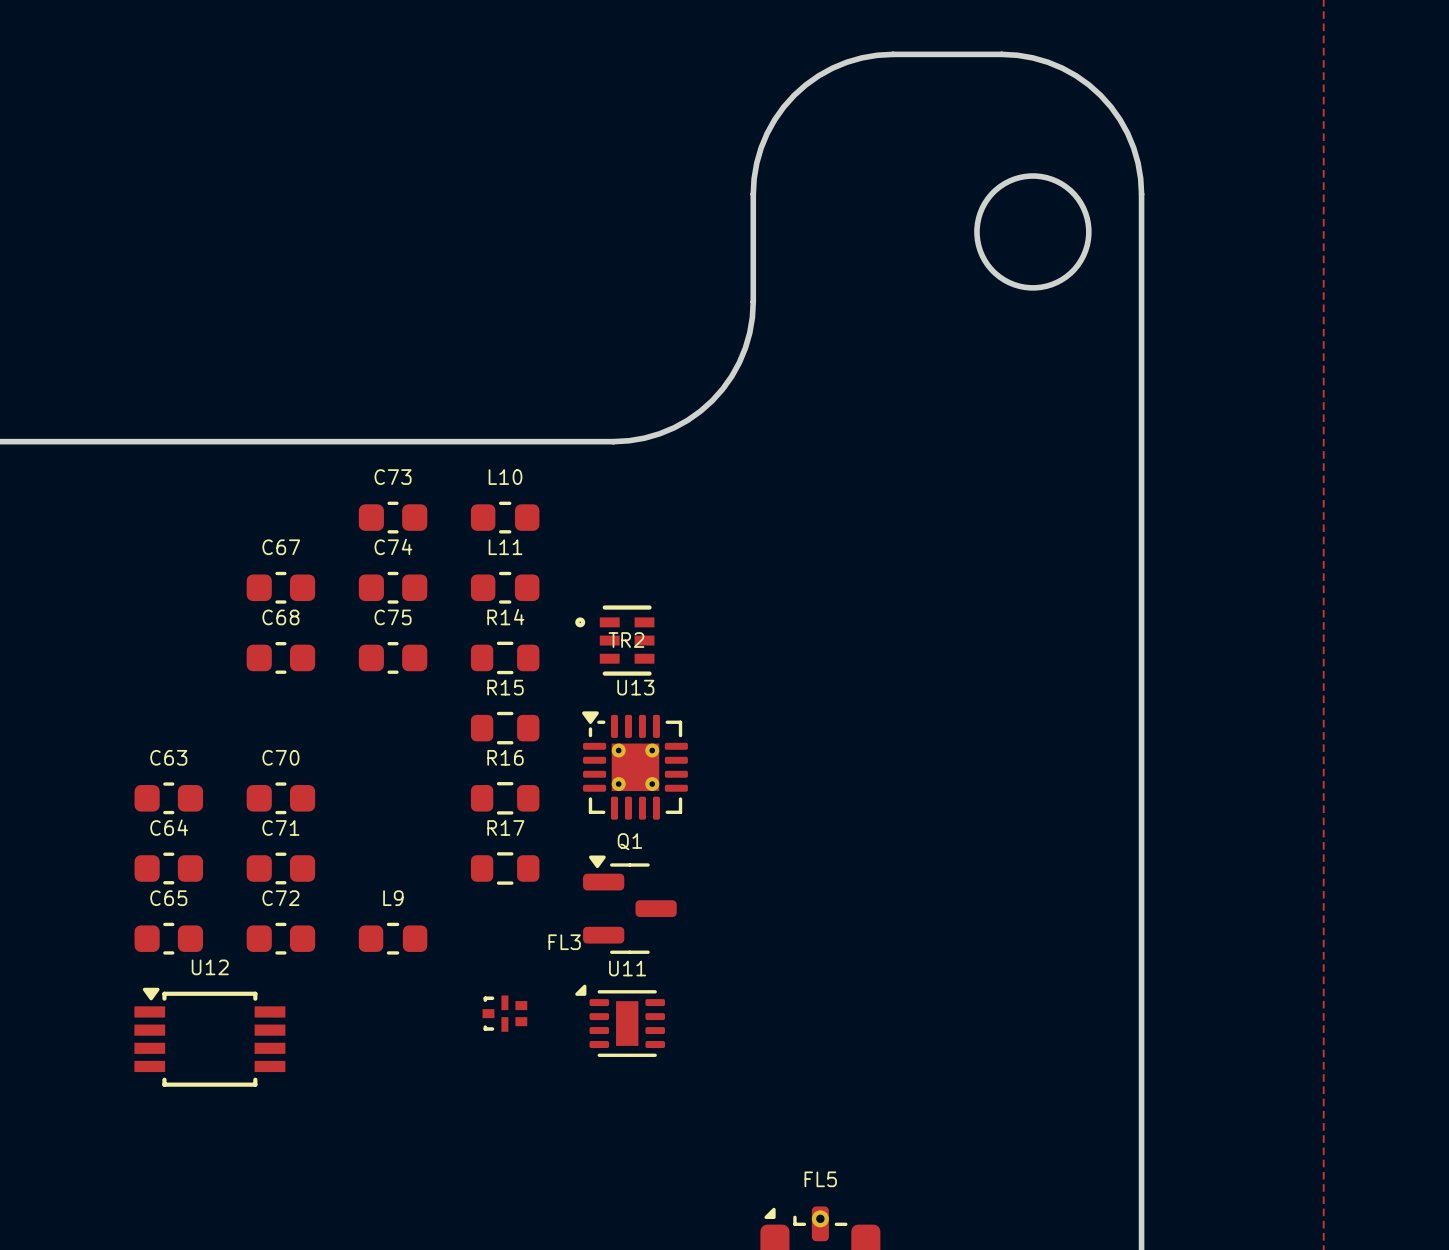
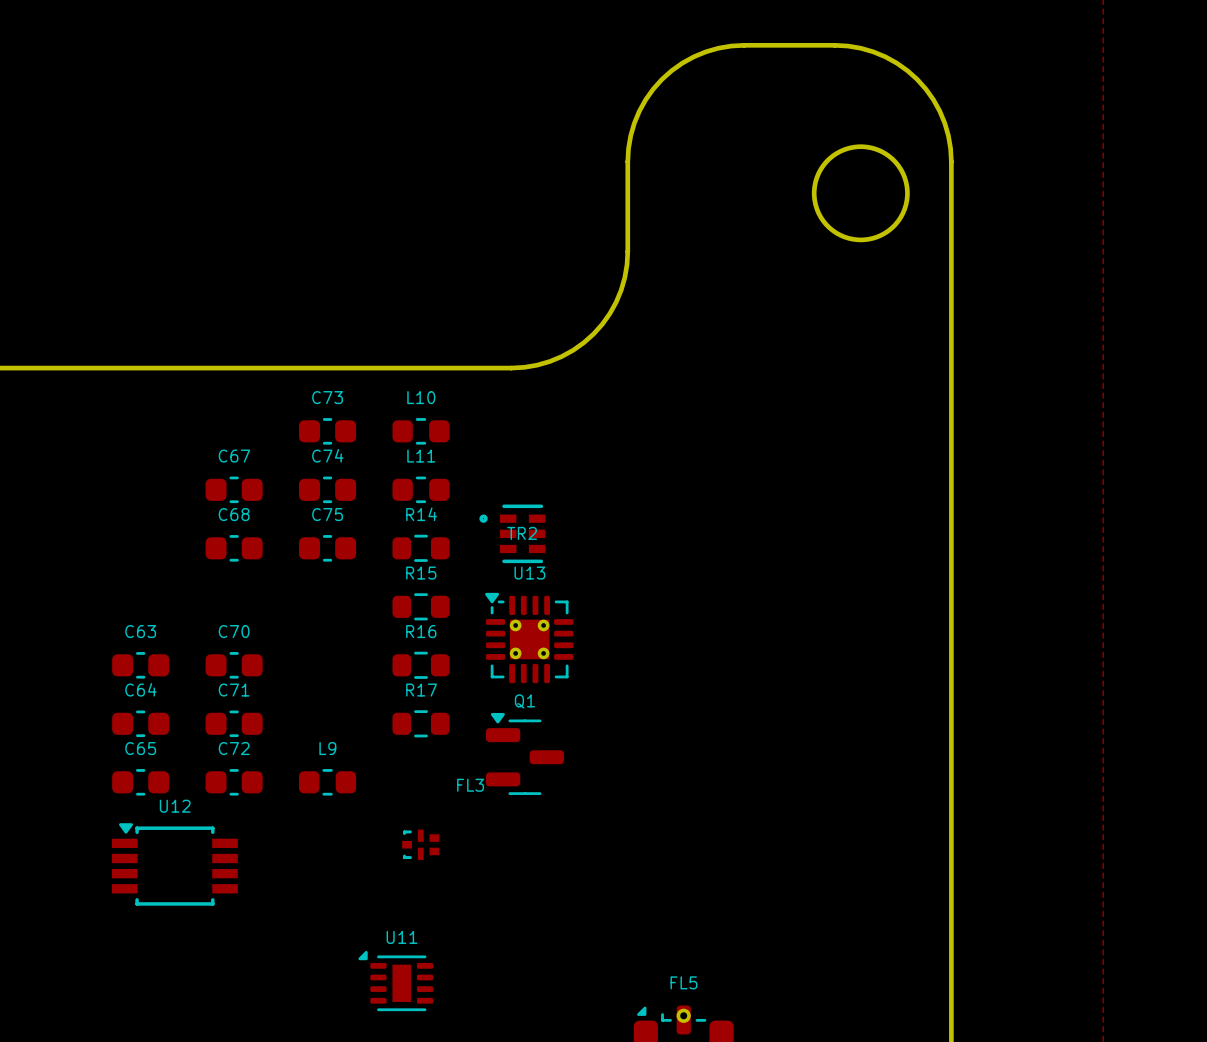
U11 position: (620, 1020) -> (395, 981)

